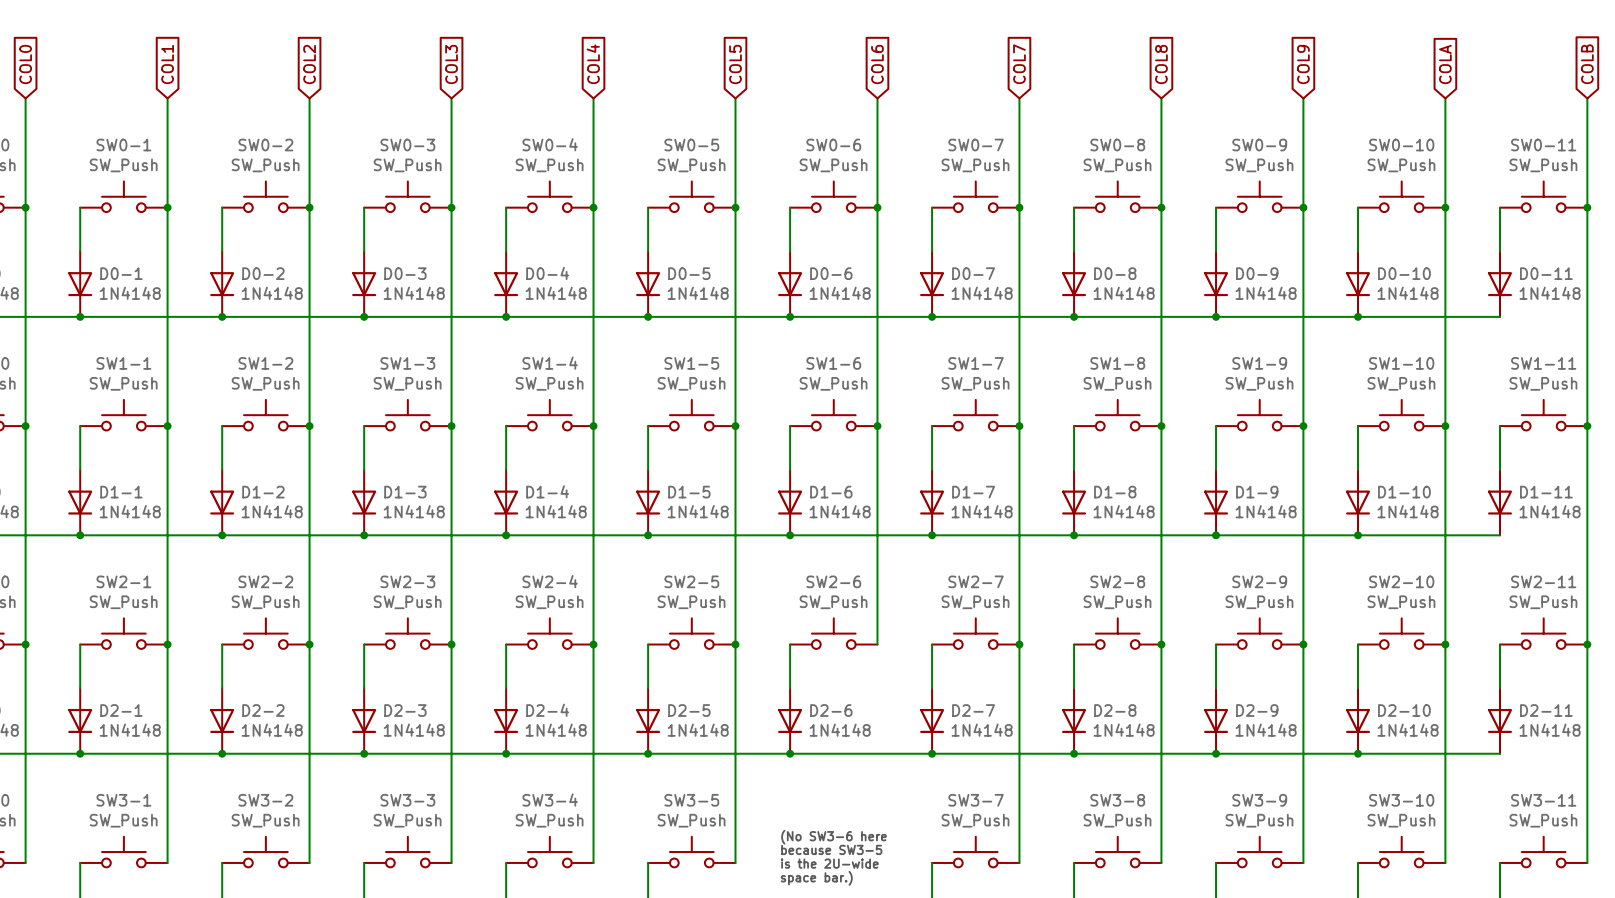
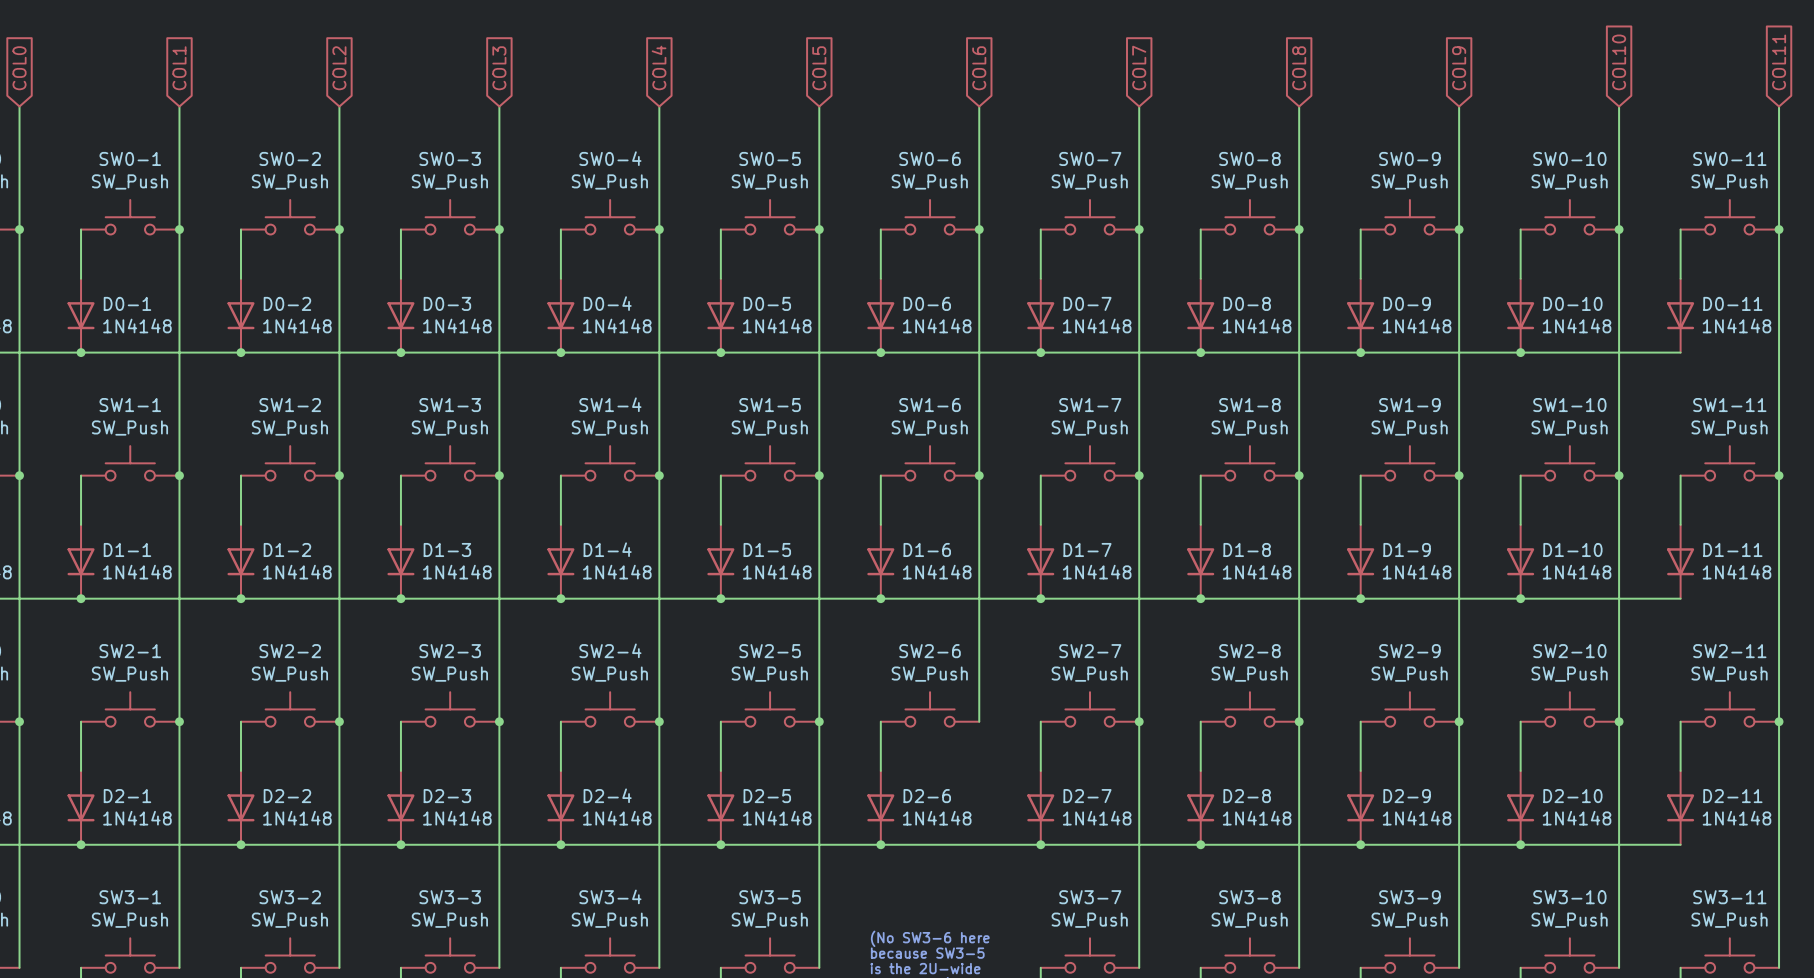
global label: COLA (1445, 64) -> COL10 (1619, 62)
global label: COLB (1587, 64) -> COL11 (1779, 62)

